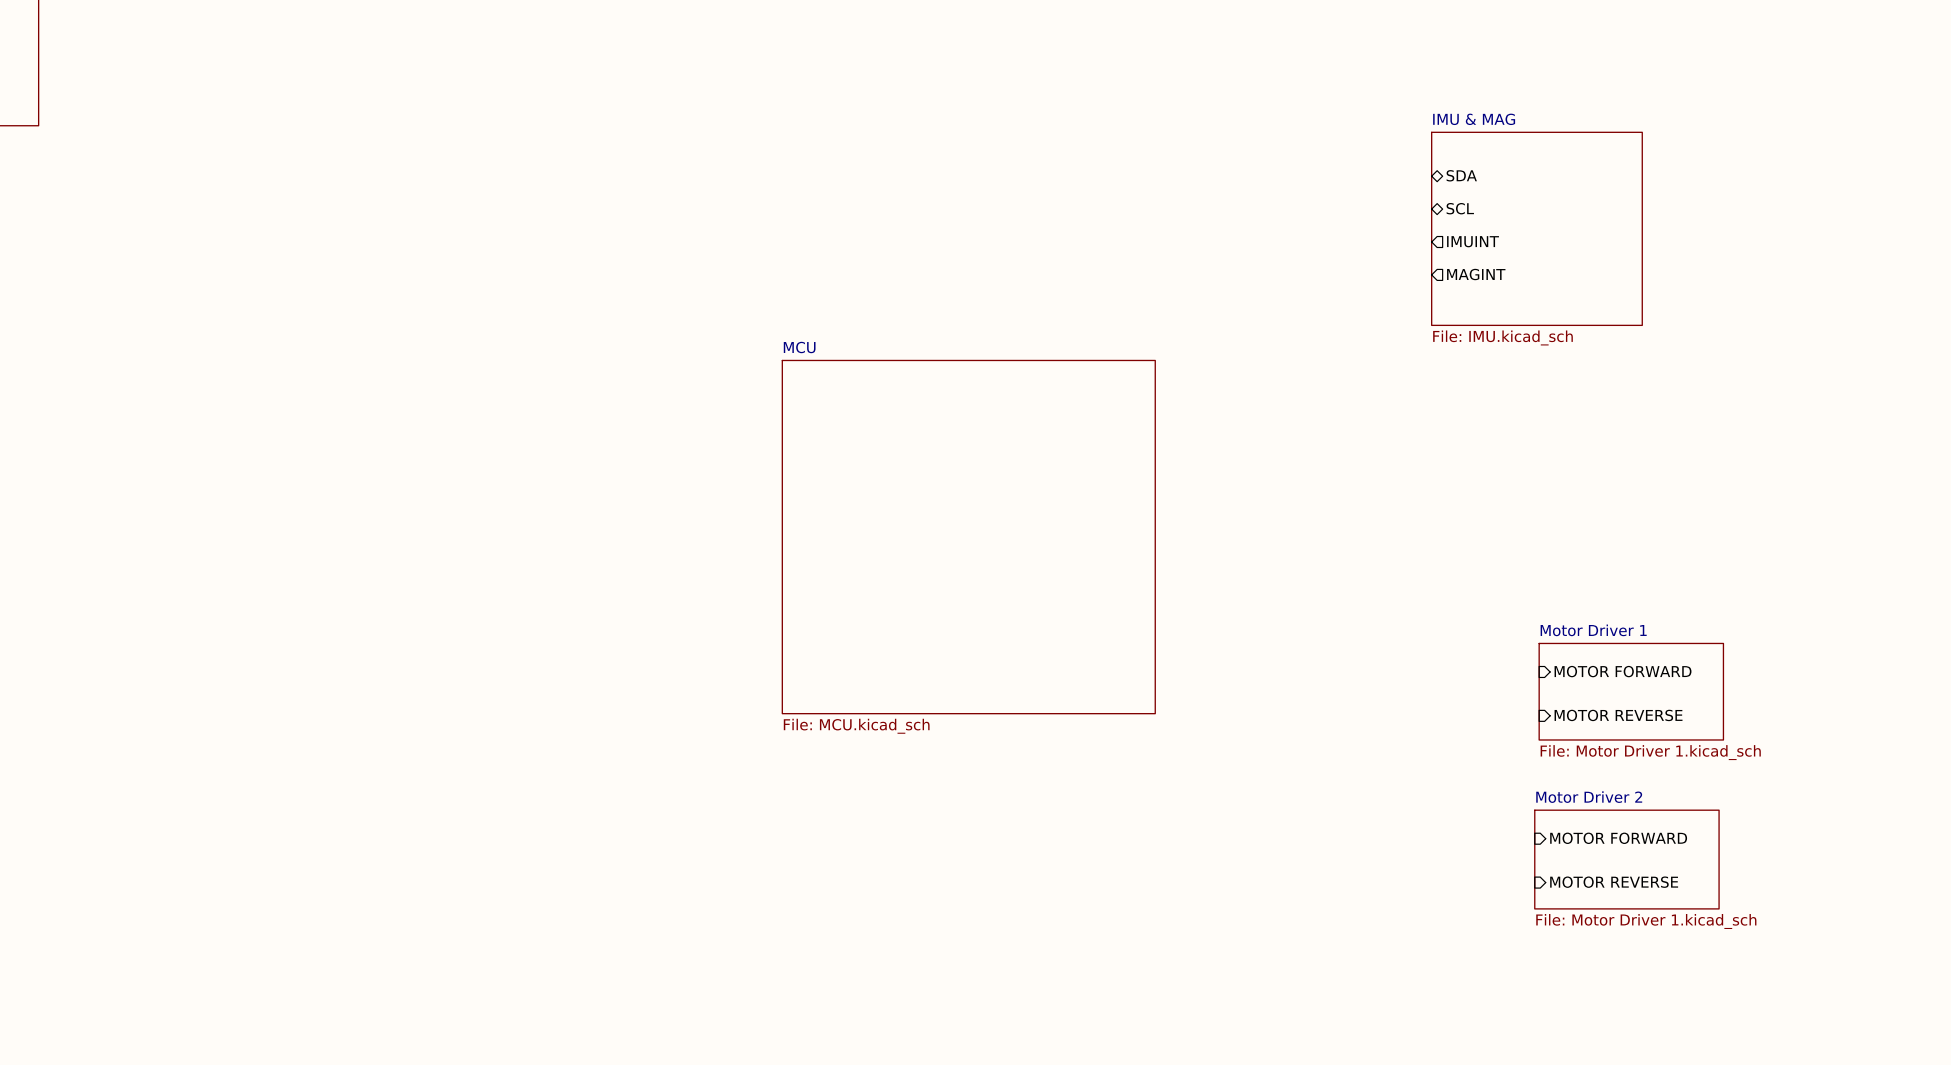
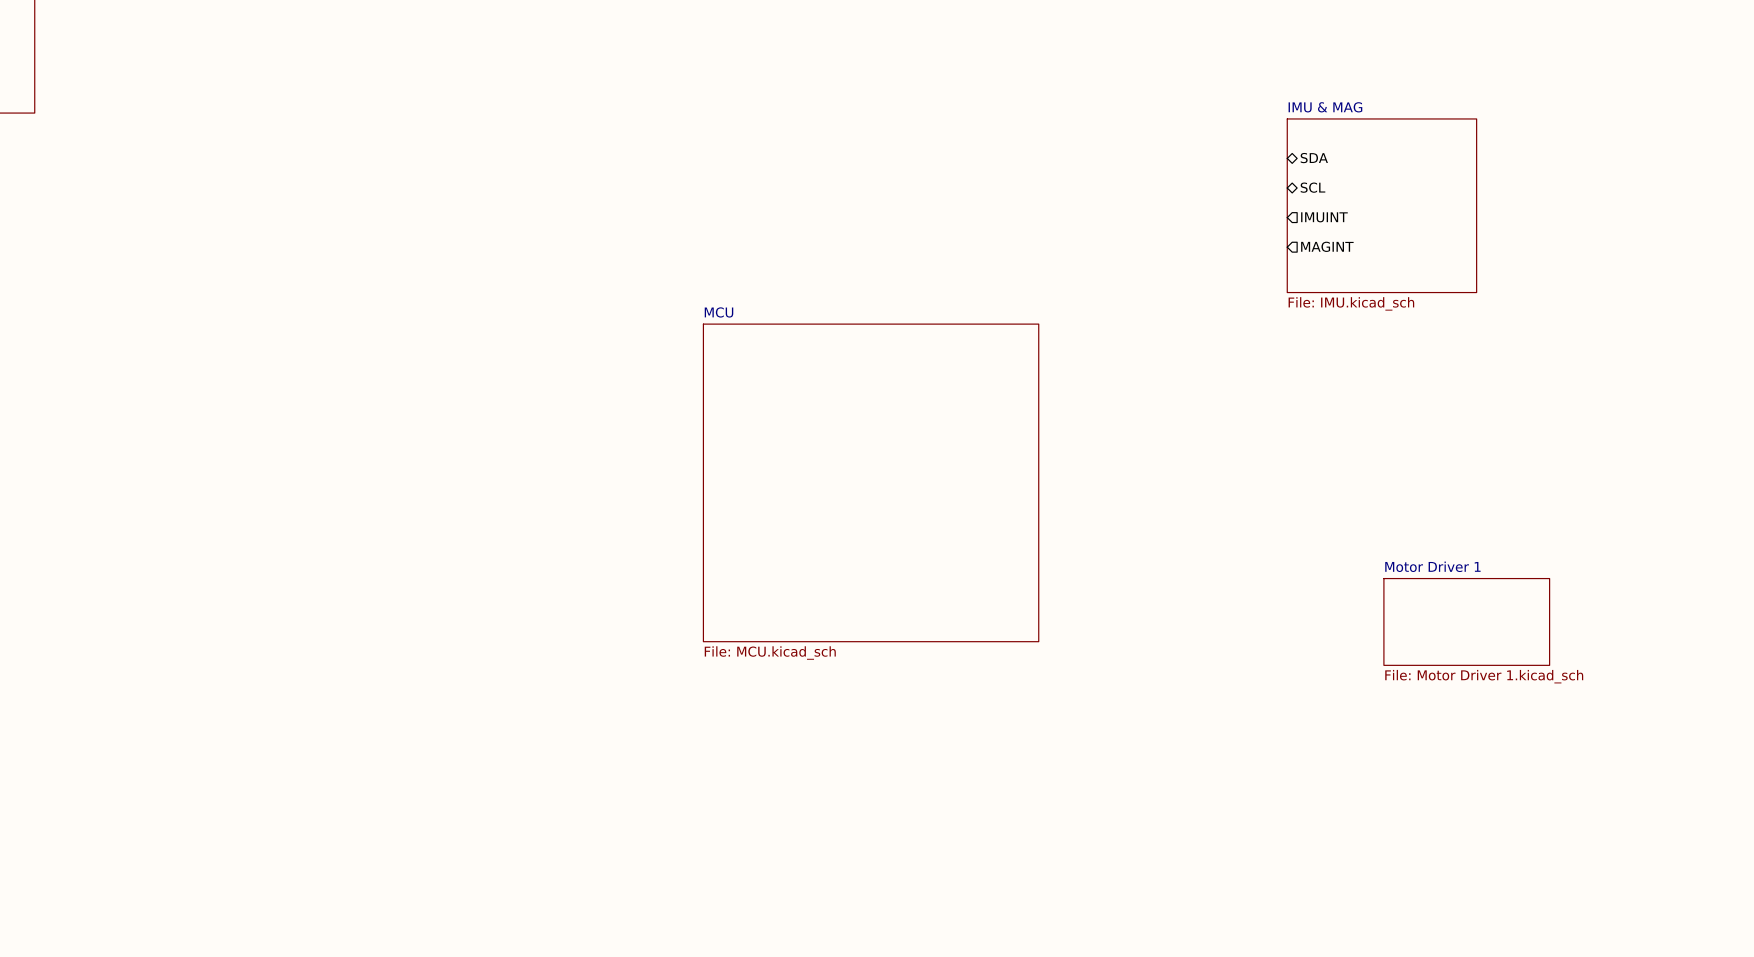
sheet pin: MOTOR FORWARD (1623, 671) -> none
sheet pin: MOTOR REVERSE (1618, 715) -> none
sheet pin: MOTOR FORWARD (1618, 838) -> none
sheet Motor Driver 2: File: Motor Driver 1.kicad_sch (1626, 859) -> none
sheet pin: MOTOR REVERSE (1614, 882) -> none

